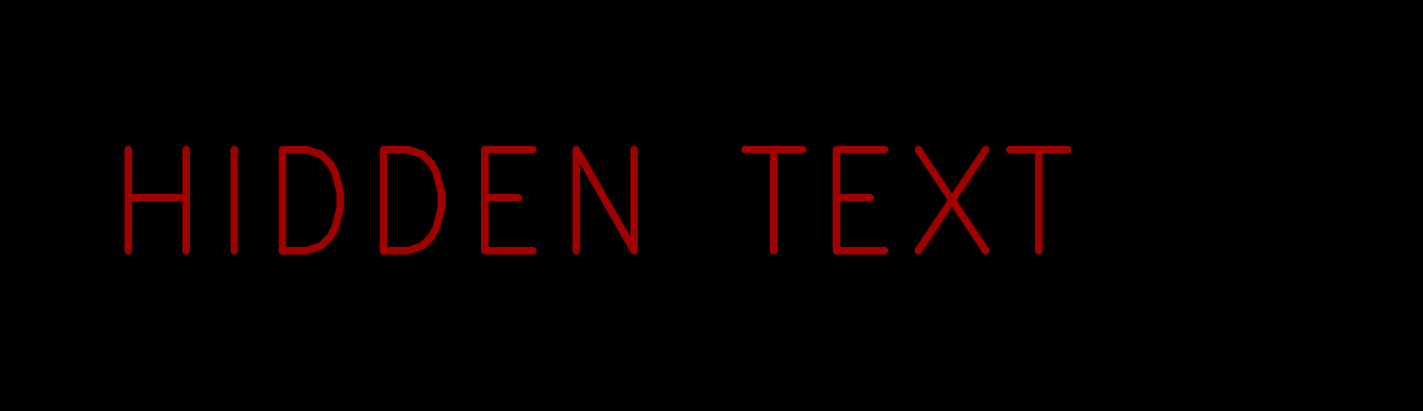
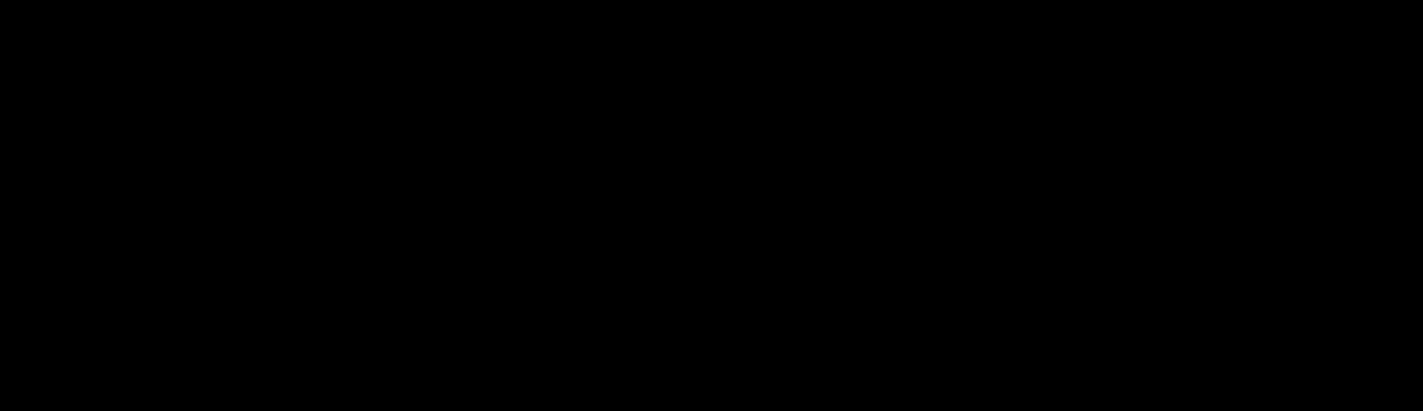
text: HIDDEN TEXT (597, 200) -> none

